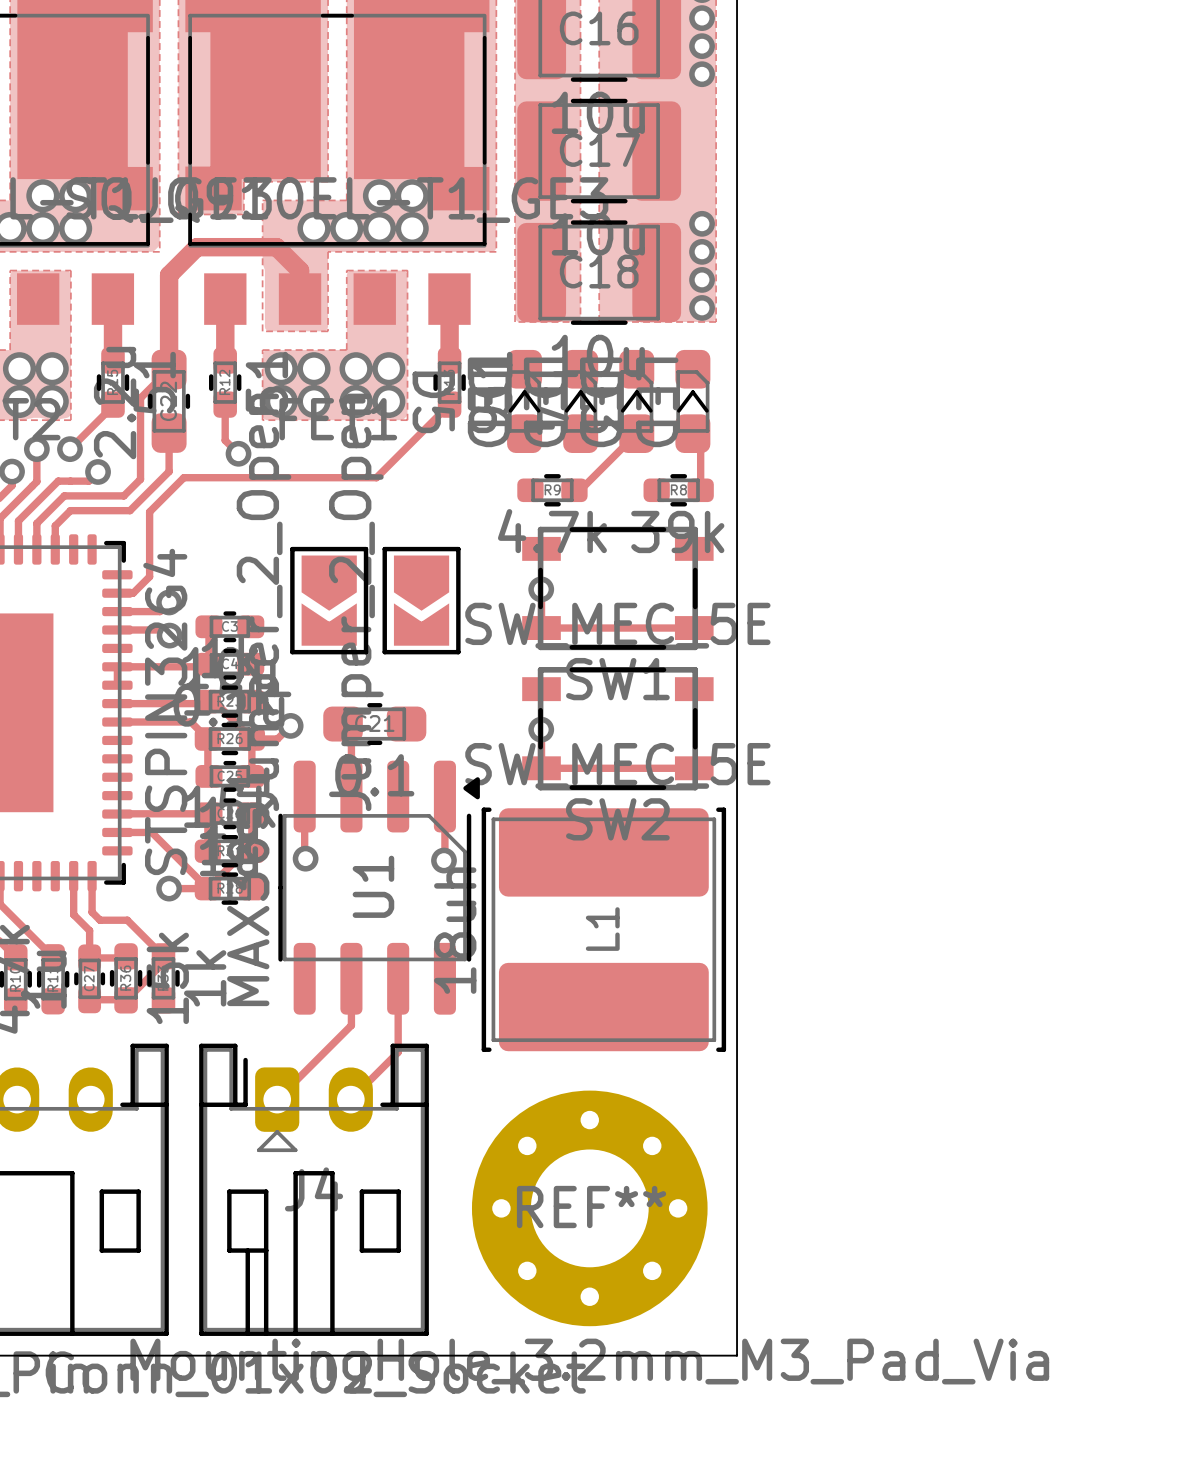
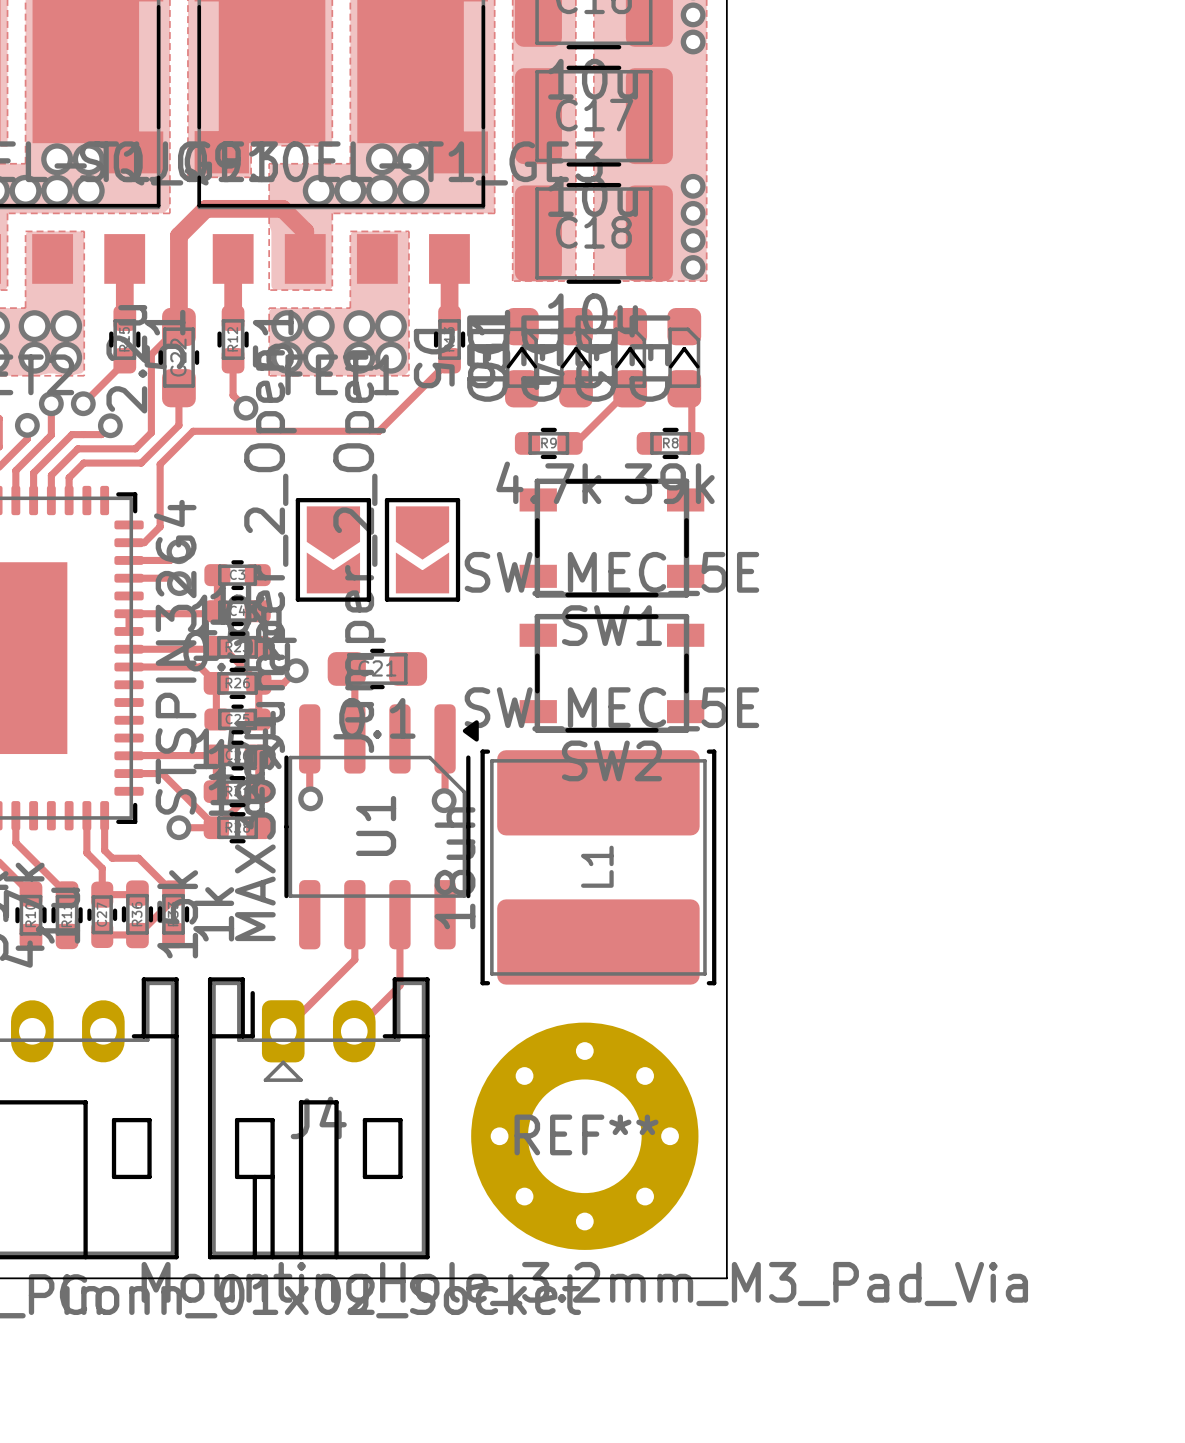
track: (541, 589) (541, 628) (694, 628) -> none
via: (541, 589) -> none
track: (541, 729) (541, 768) (694, 768) -> none
via: (541, 729) -> none

